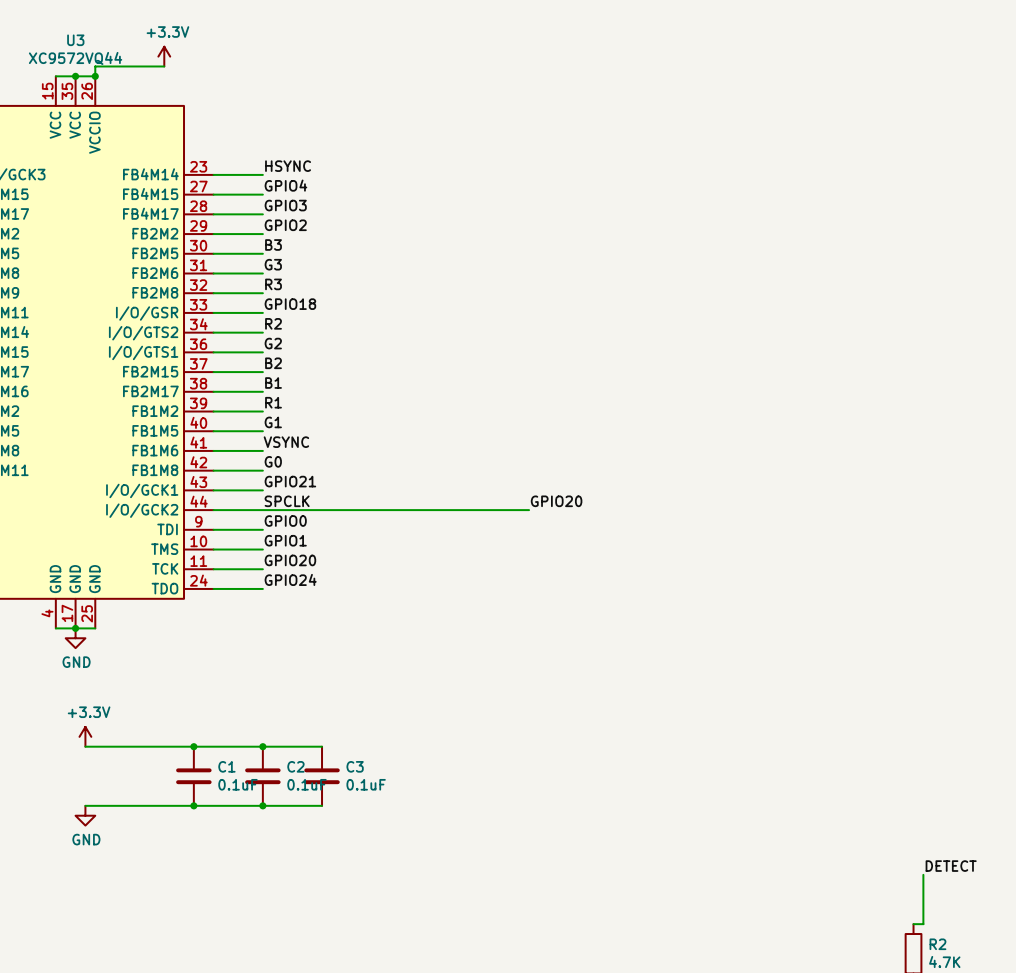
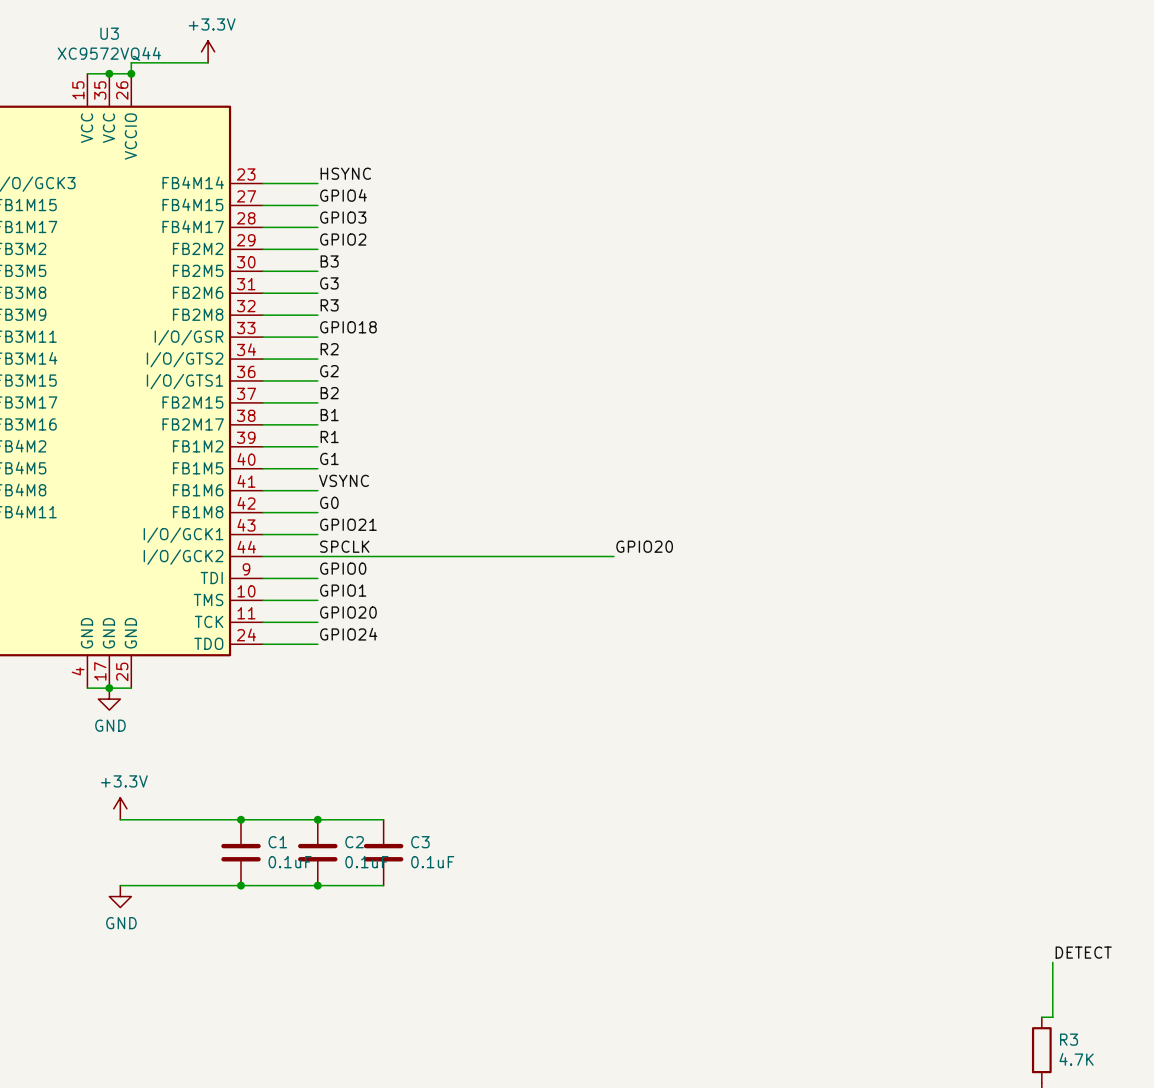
R2 name: R2 (937, 944) -> R3 (1069, 1039)

